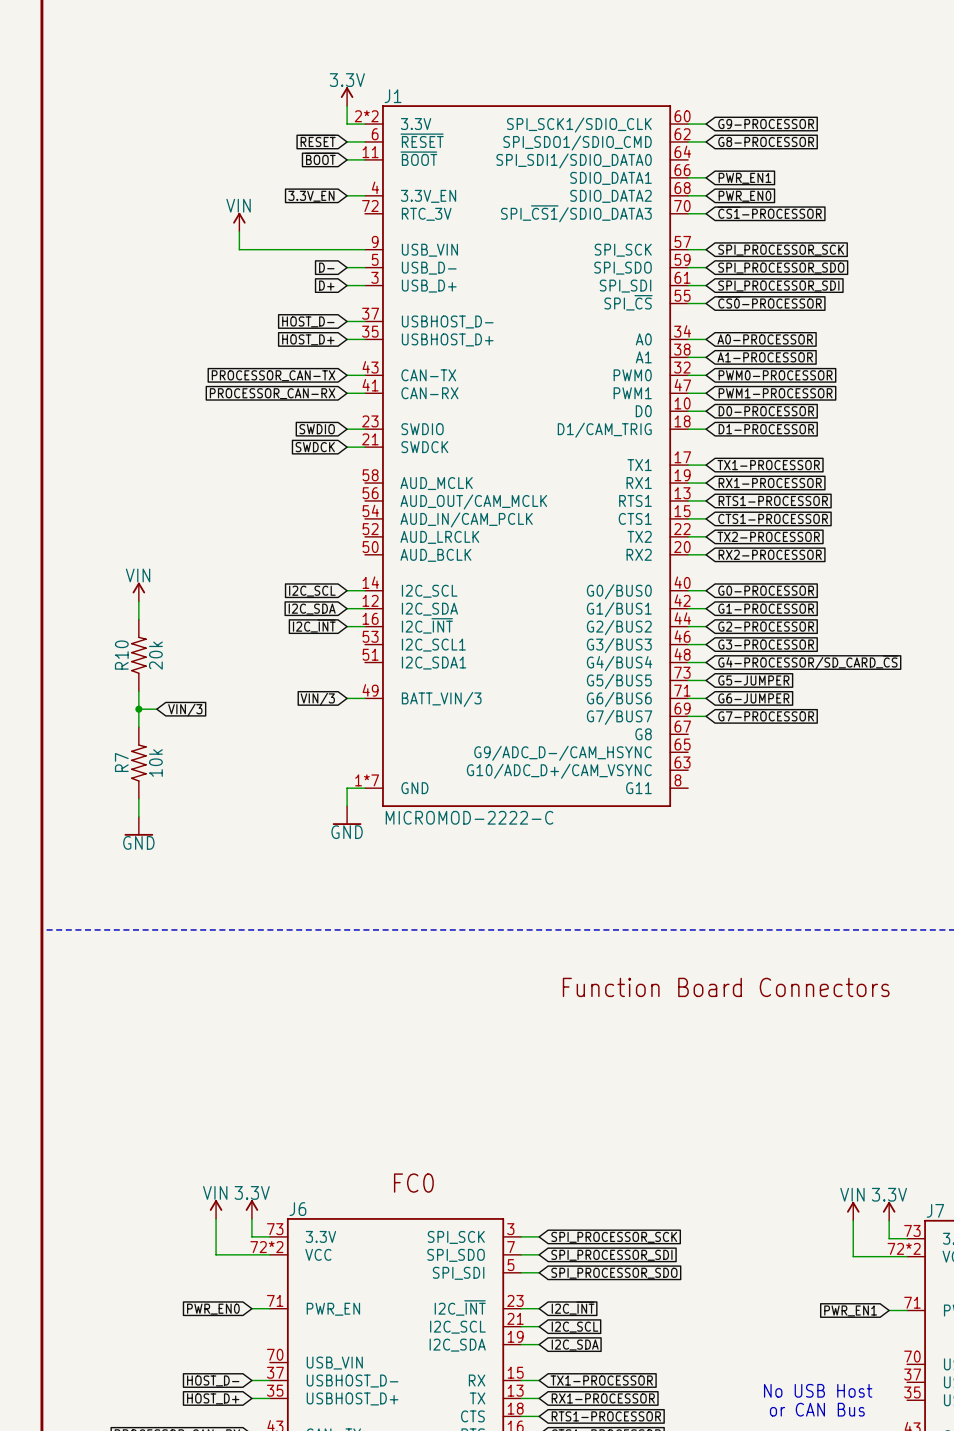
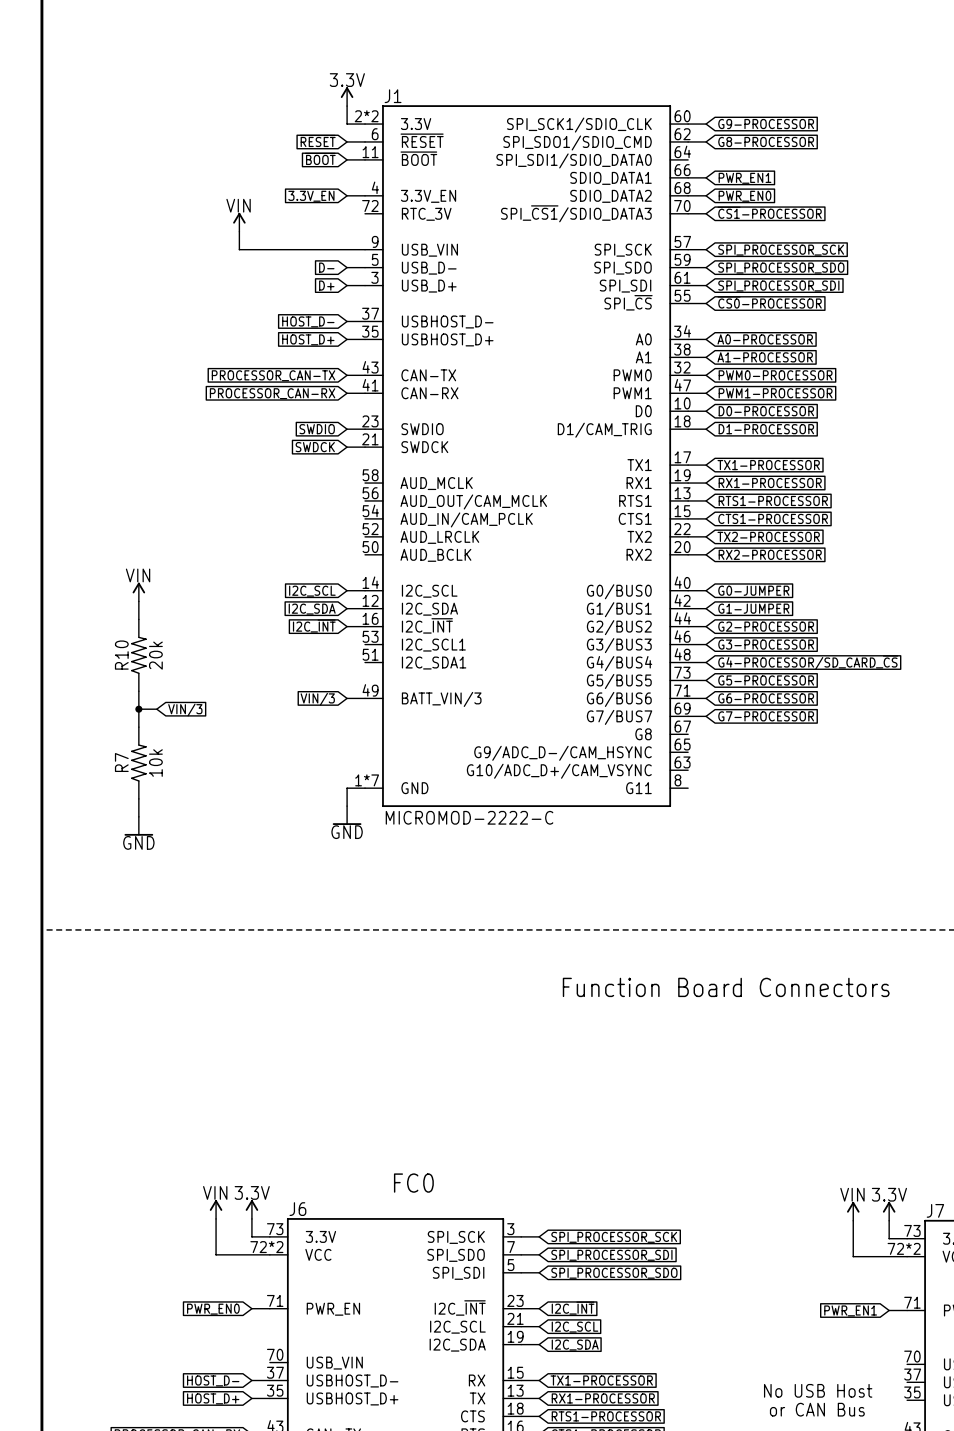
global label: G0-PROCESSOR (766, 590) -> G0-JUMPER (753, 590)
global label: G1-PROCESSOR (766, 608) -> G1-JUMPER (753, 608)
global label: G5-JUMPER (753, 680) -> G5-PROCESSOR (766, 680)
global label: G6-JUMPER (753, 698) -> G6-PROCESSOR (766, 698)

